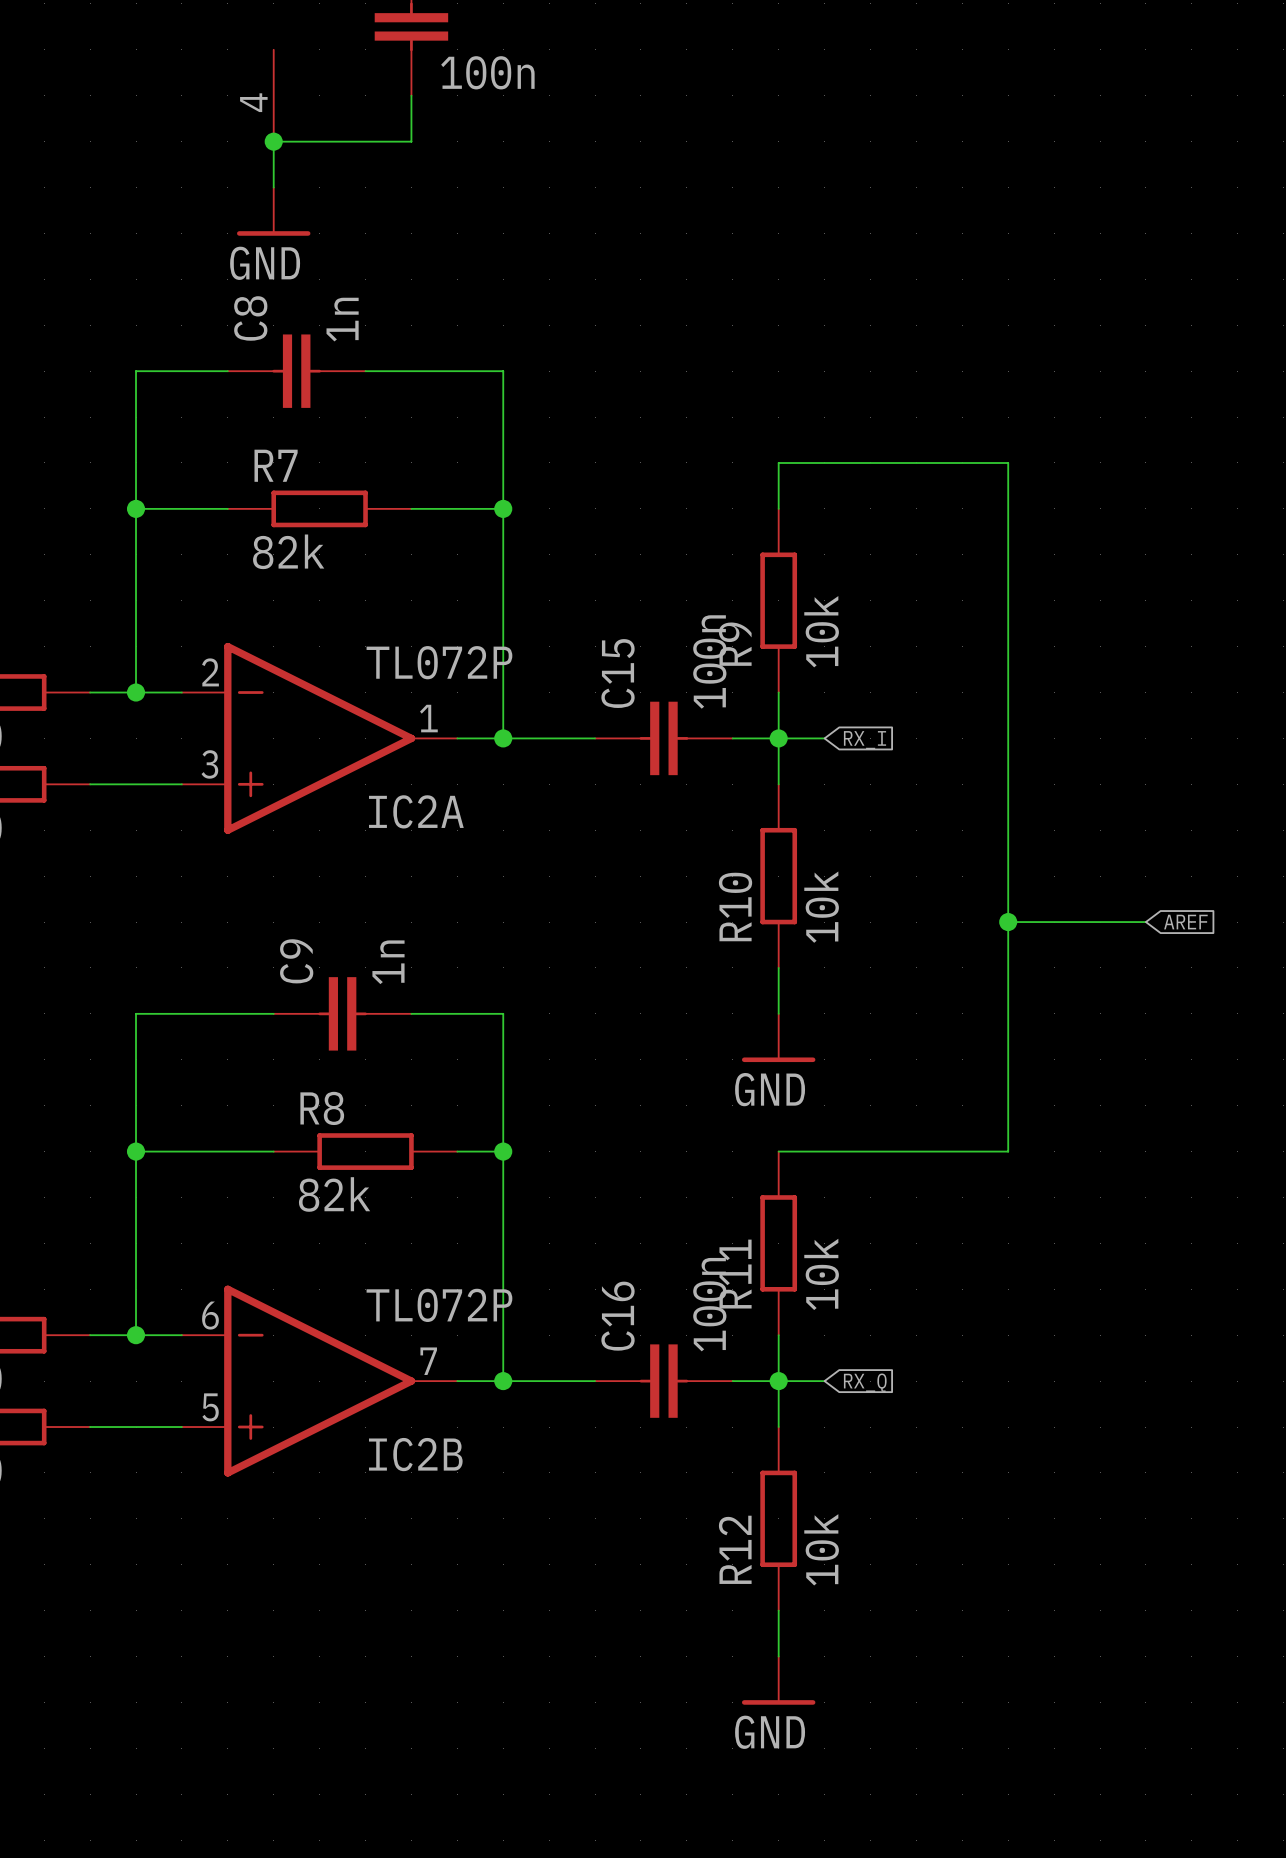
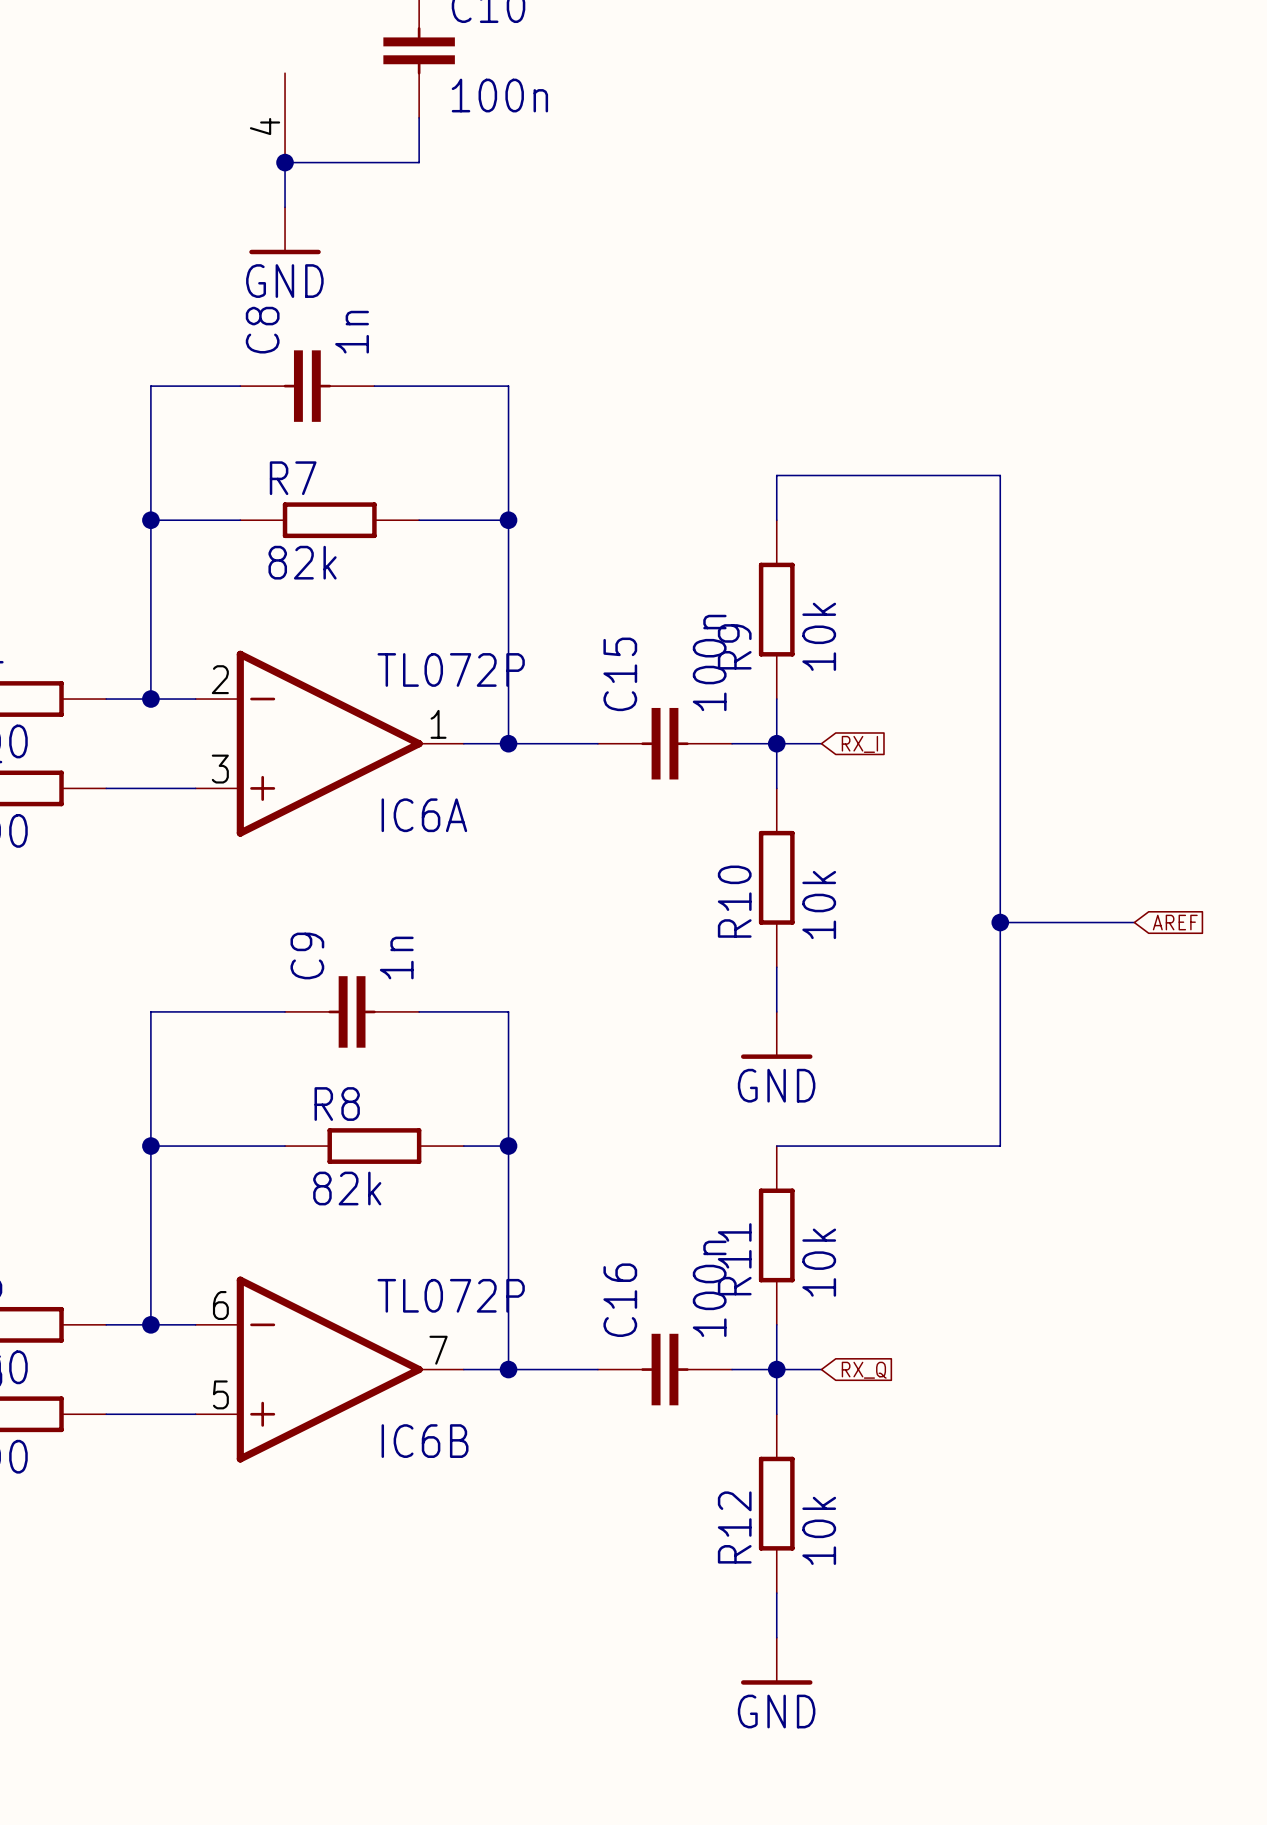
IC2A name: IC2A (416, 811) -> IC6A (424, 815)
IC2B name: IC2B (415, 1454) -> IC6B (425, 1441)

